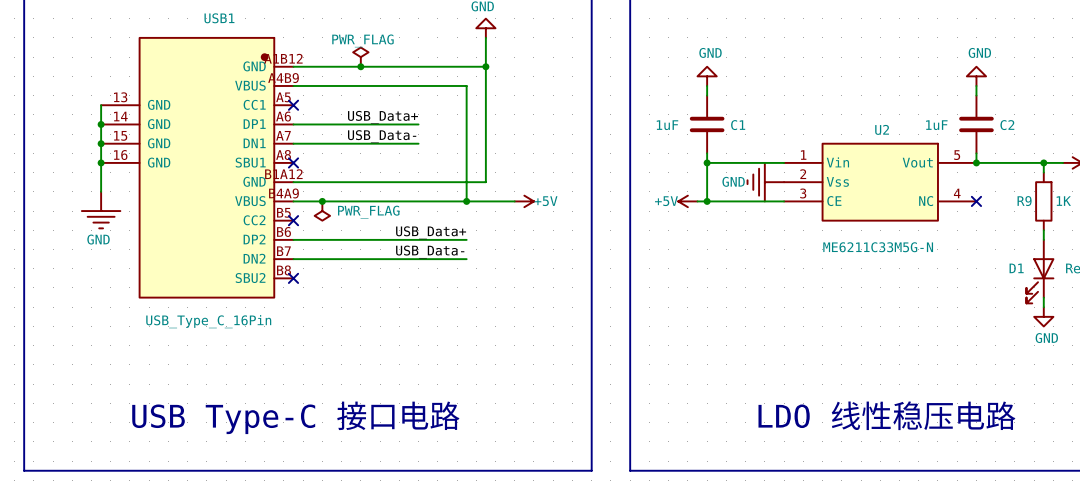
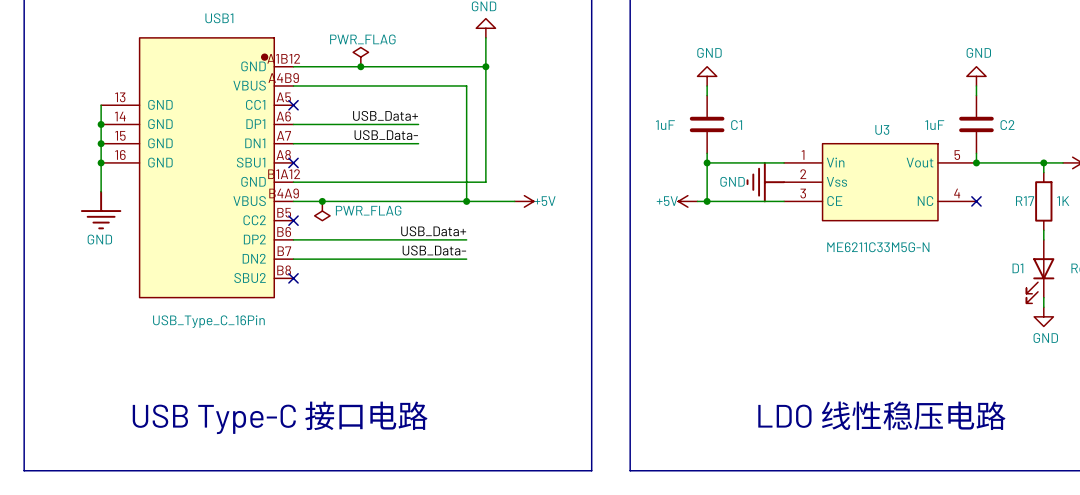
U2 name: U2 (882, 129) -> U3 (882, 129)
R9 name: R9 (1024, 201) -> R17 (1025, 201)

